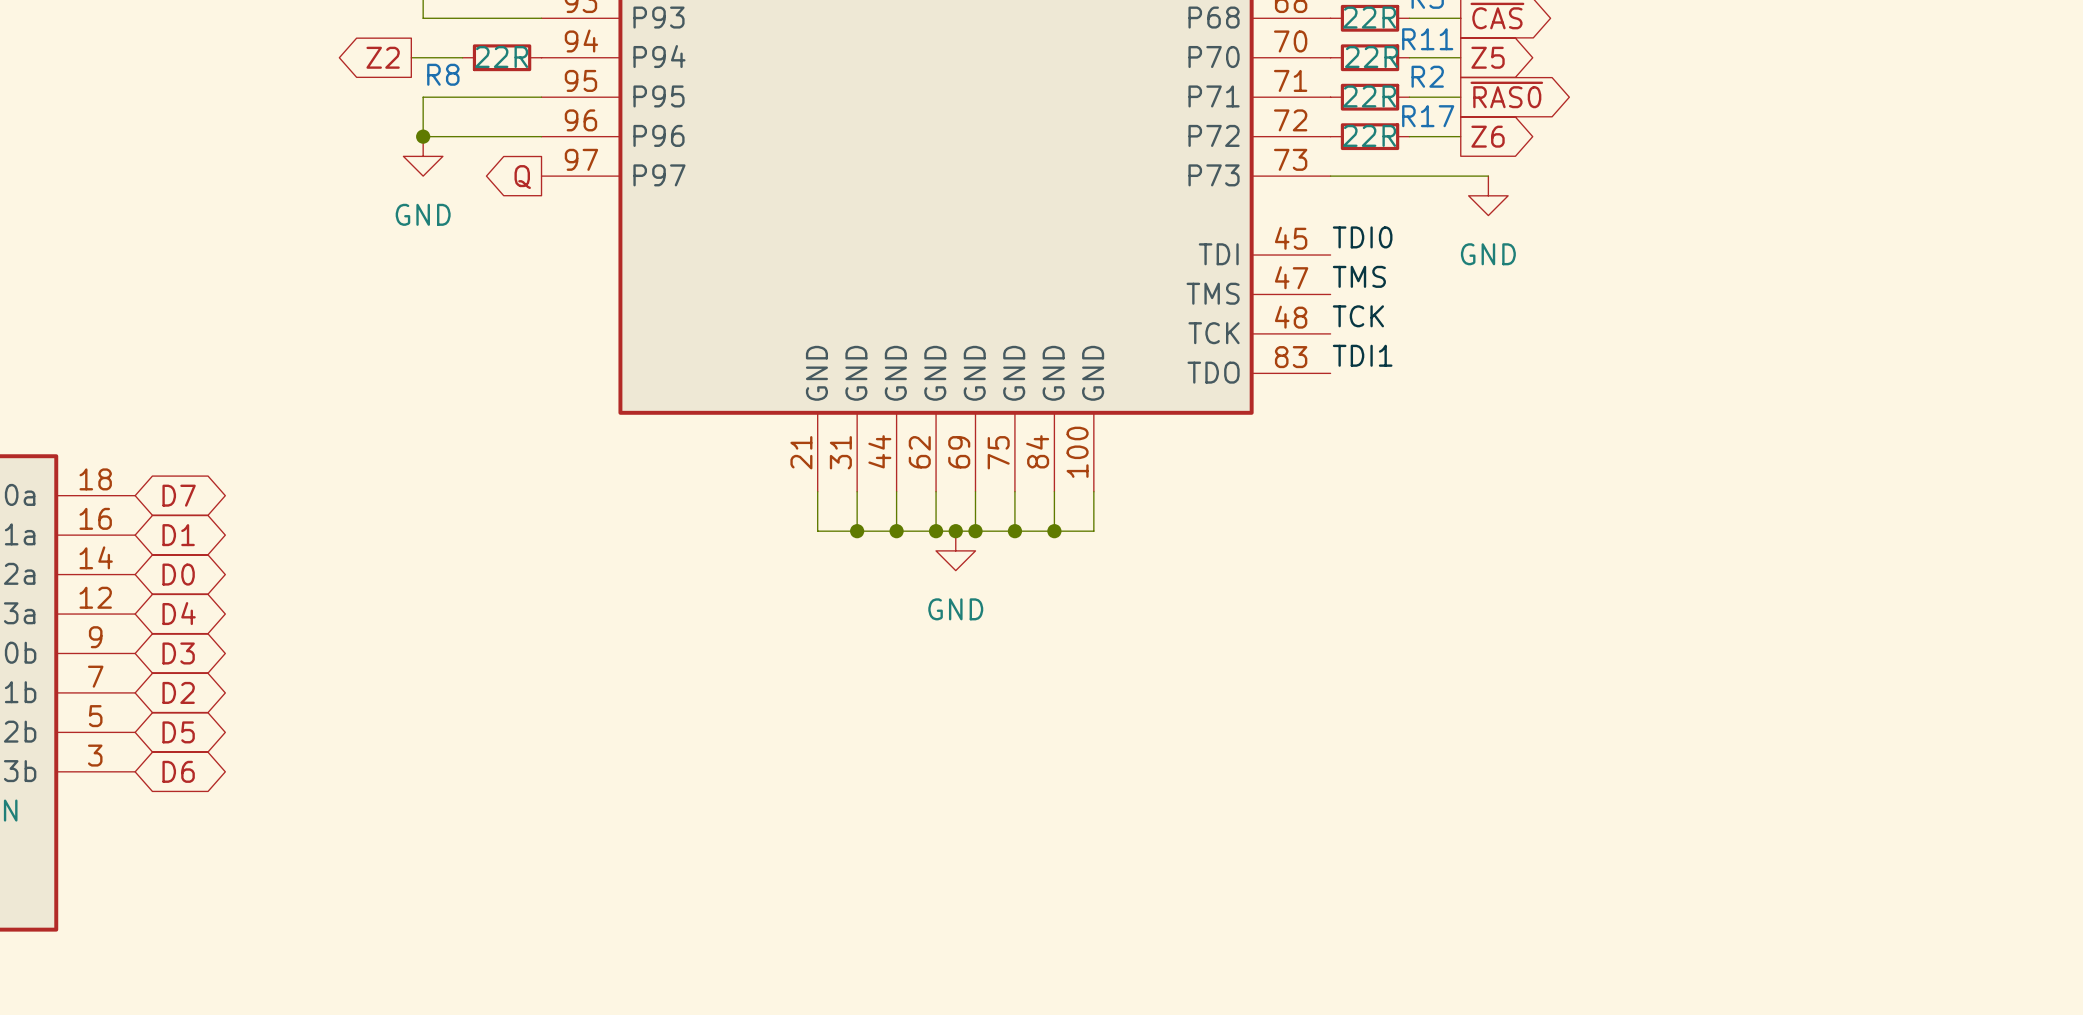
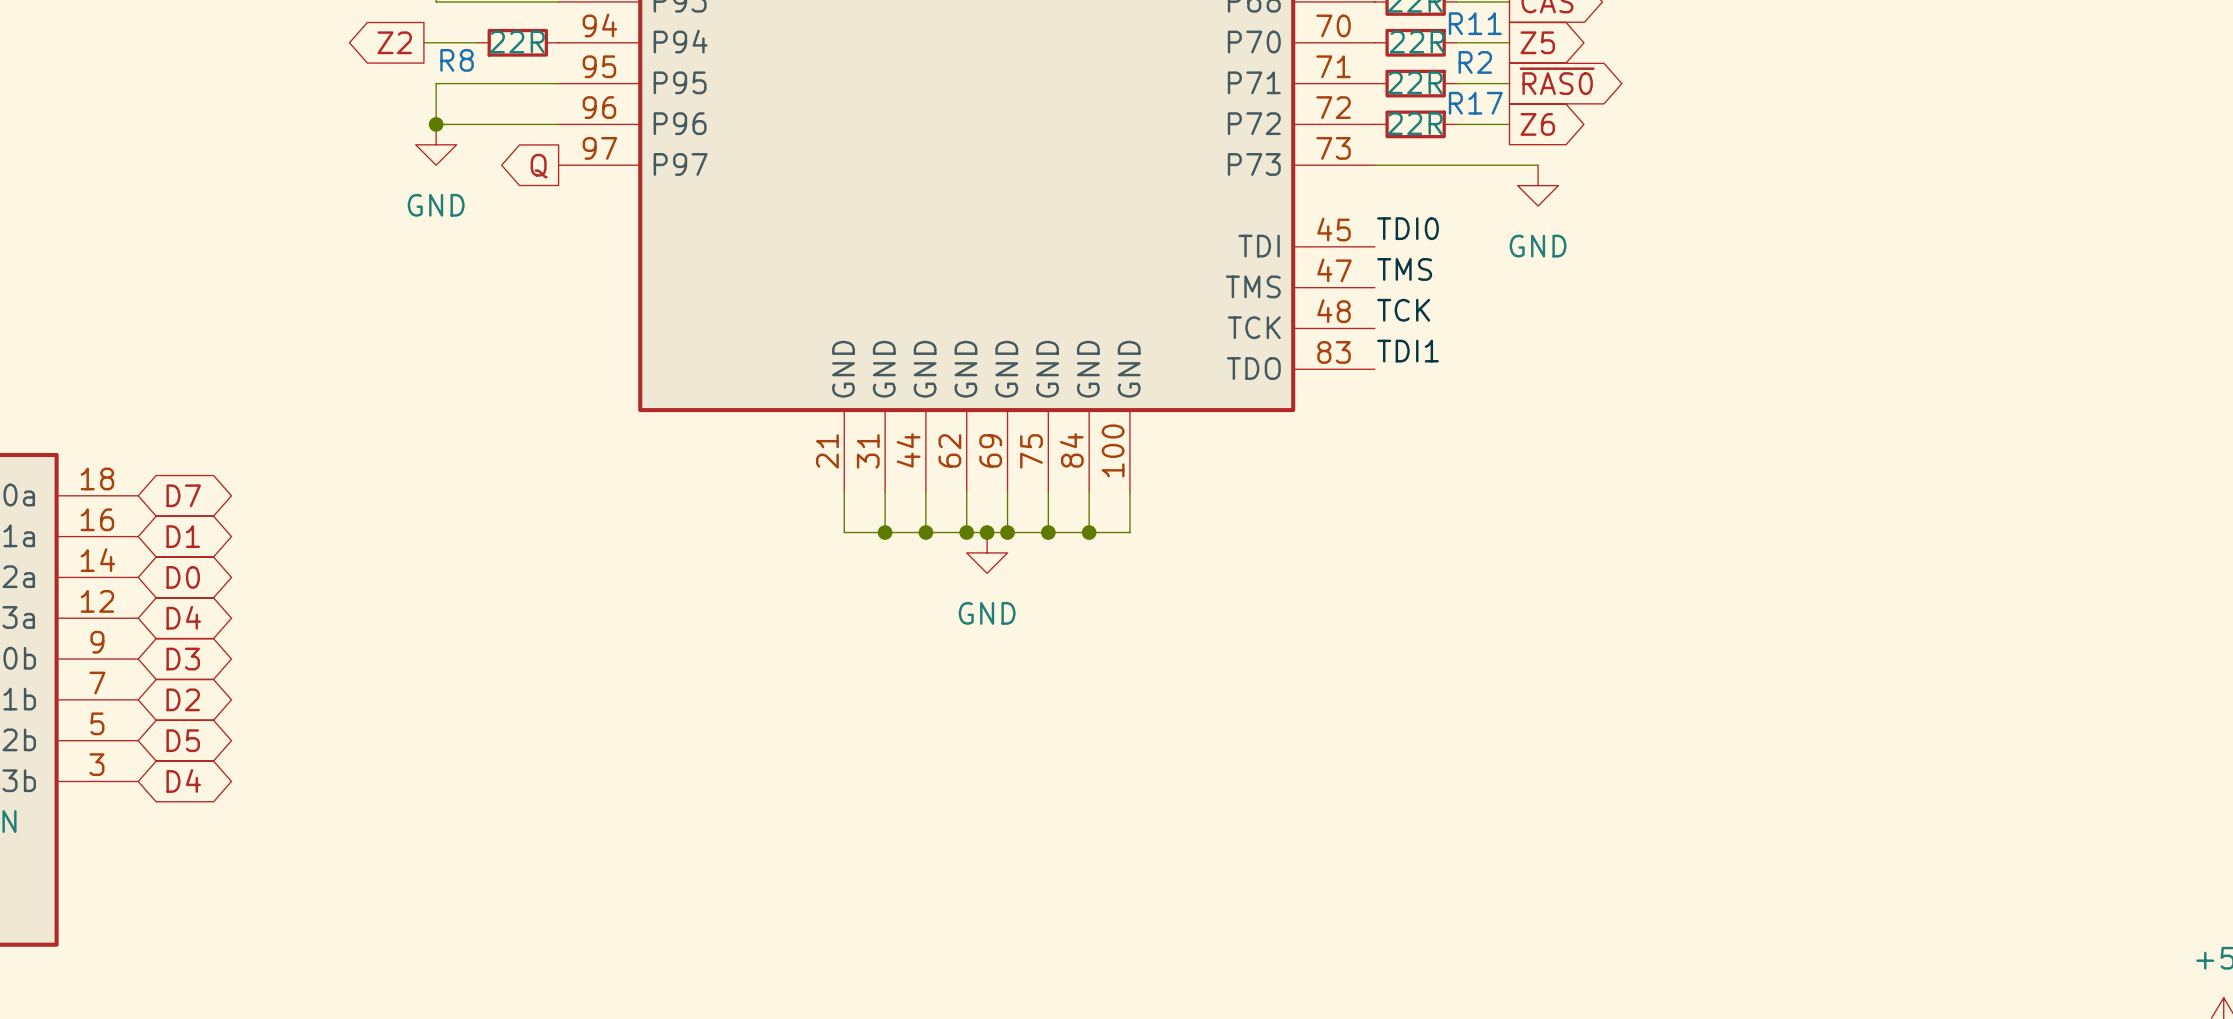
global label: D6 (178, 771) -> D4 (183, 781)

